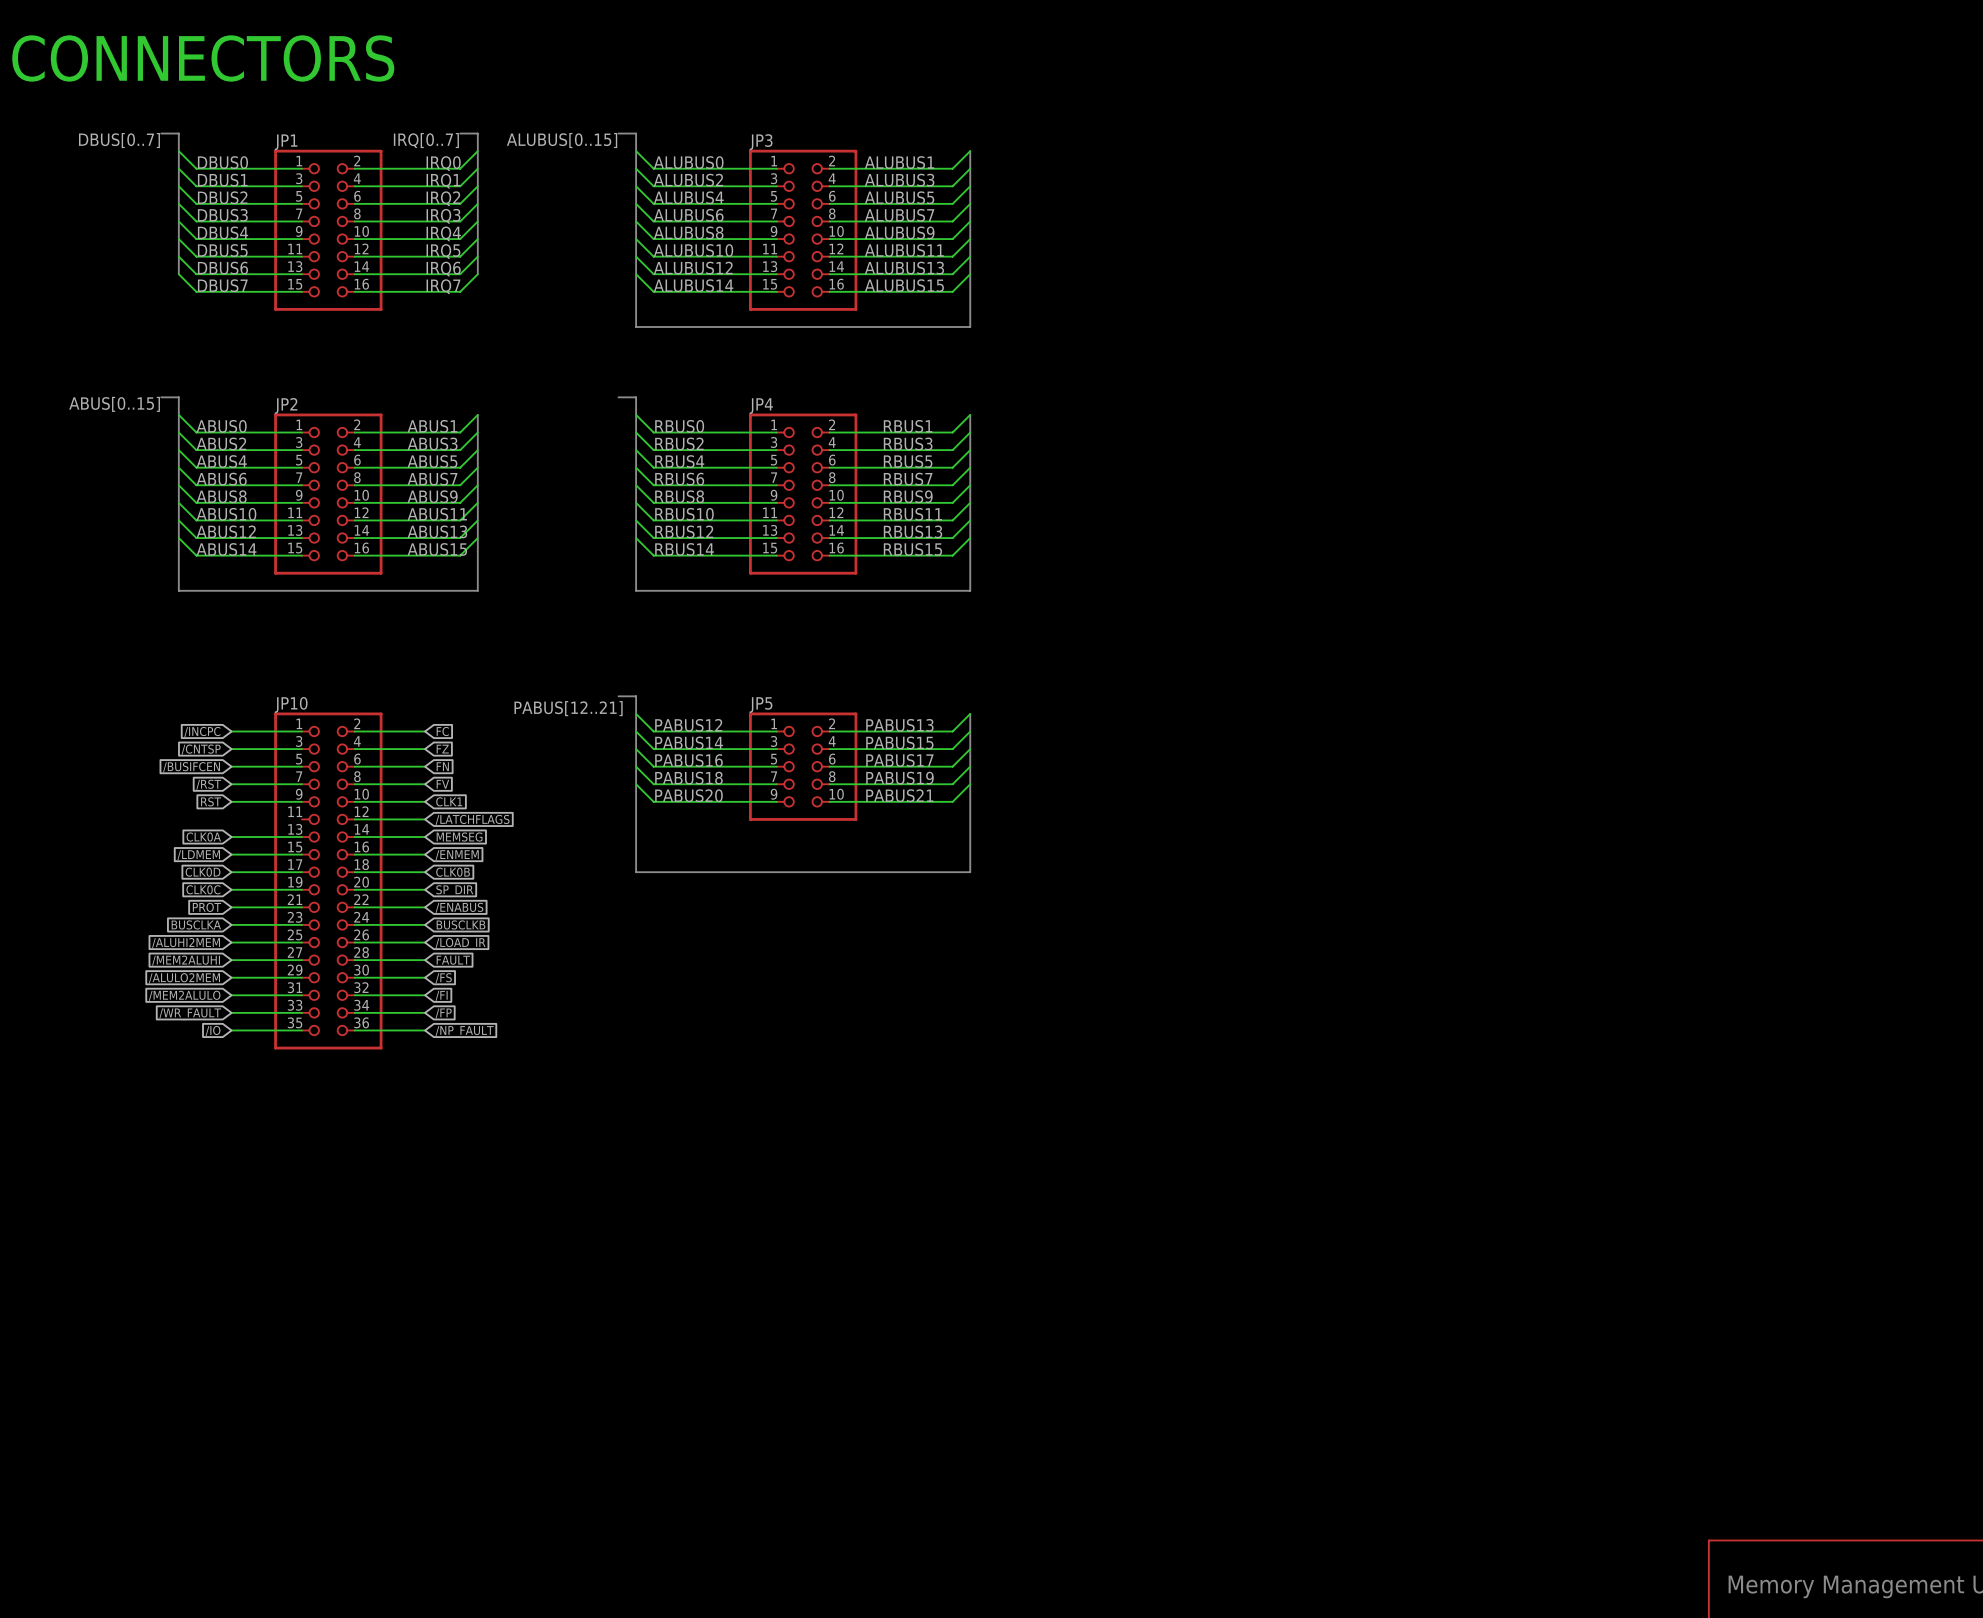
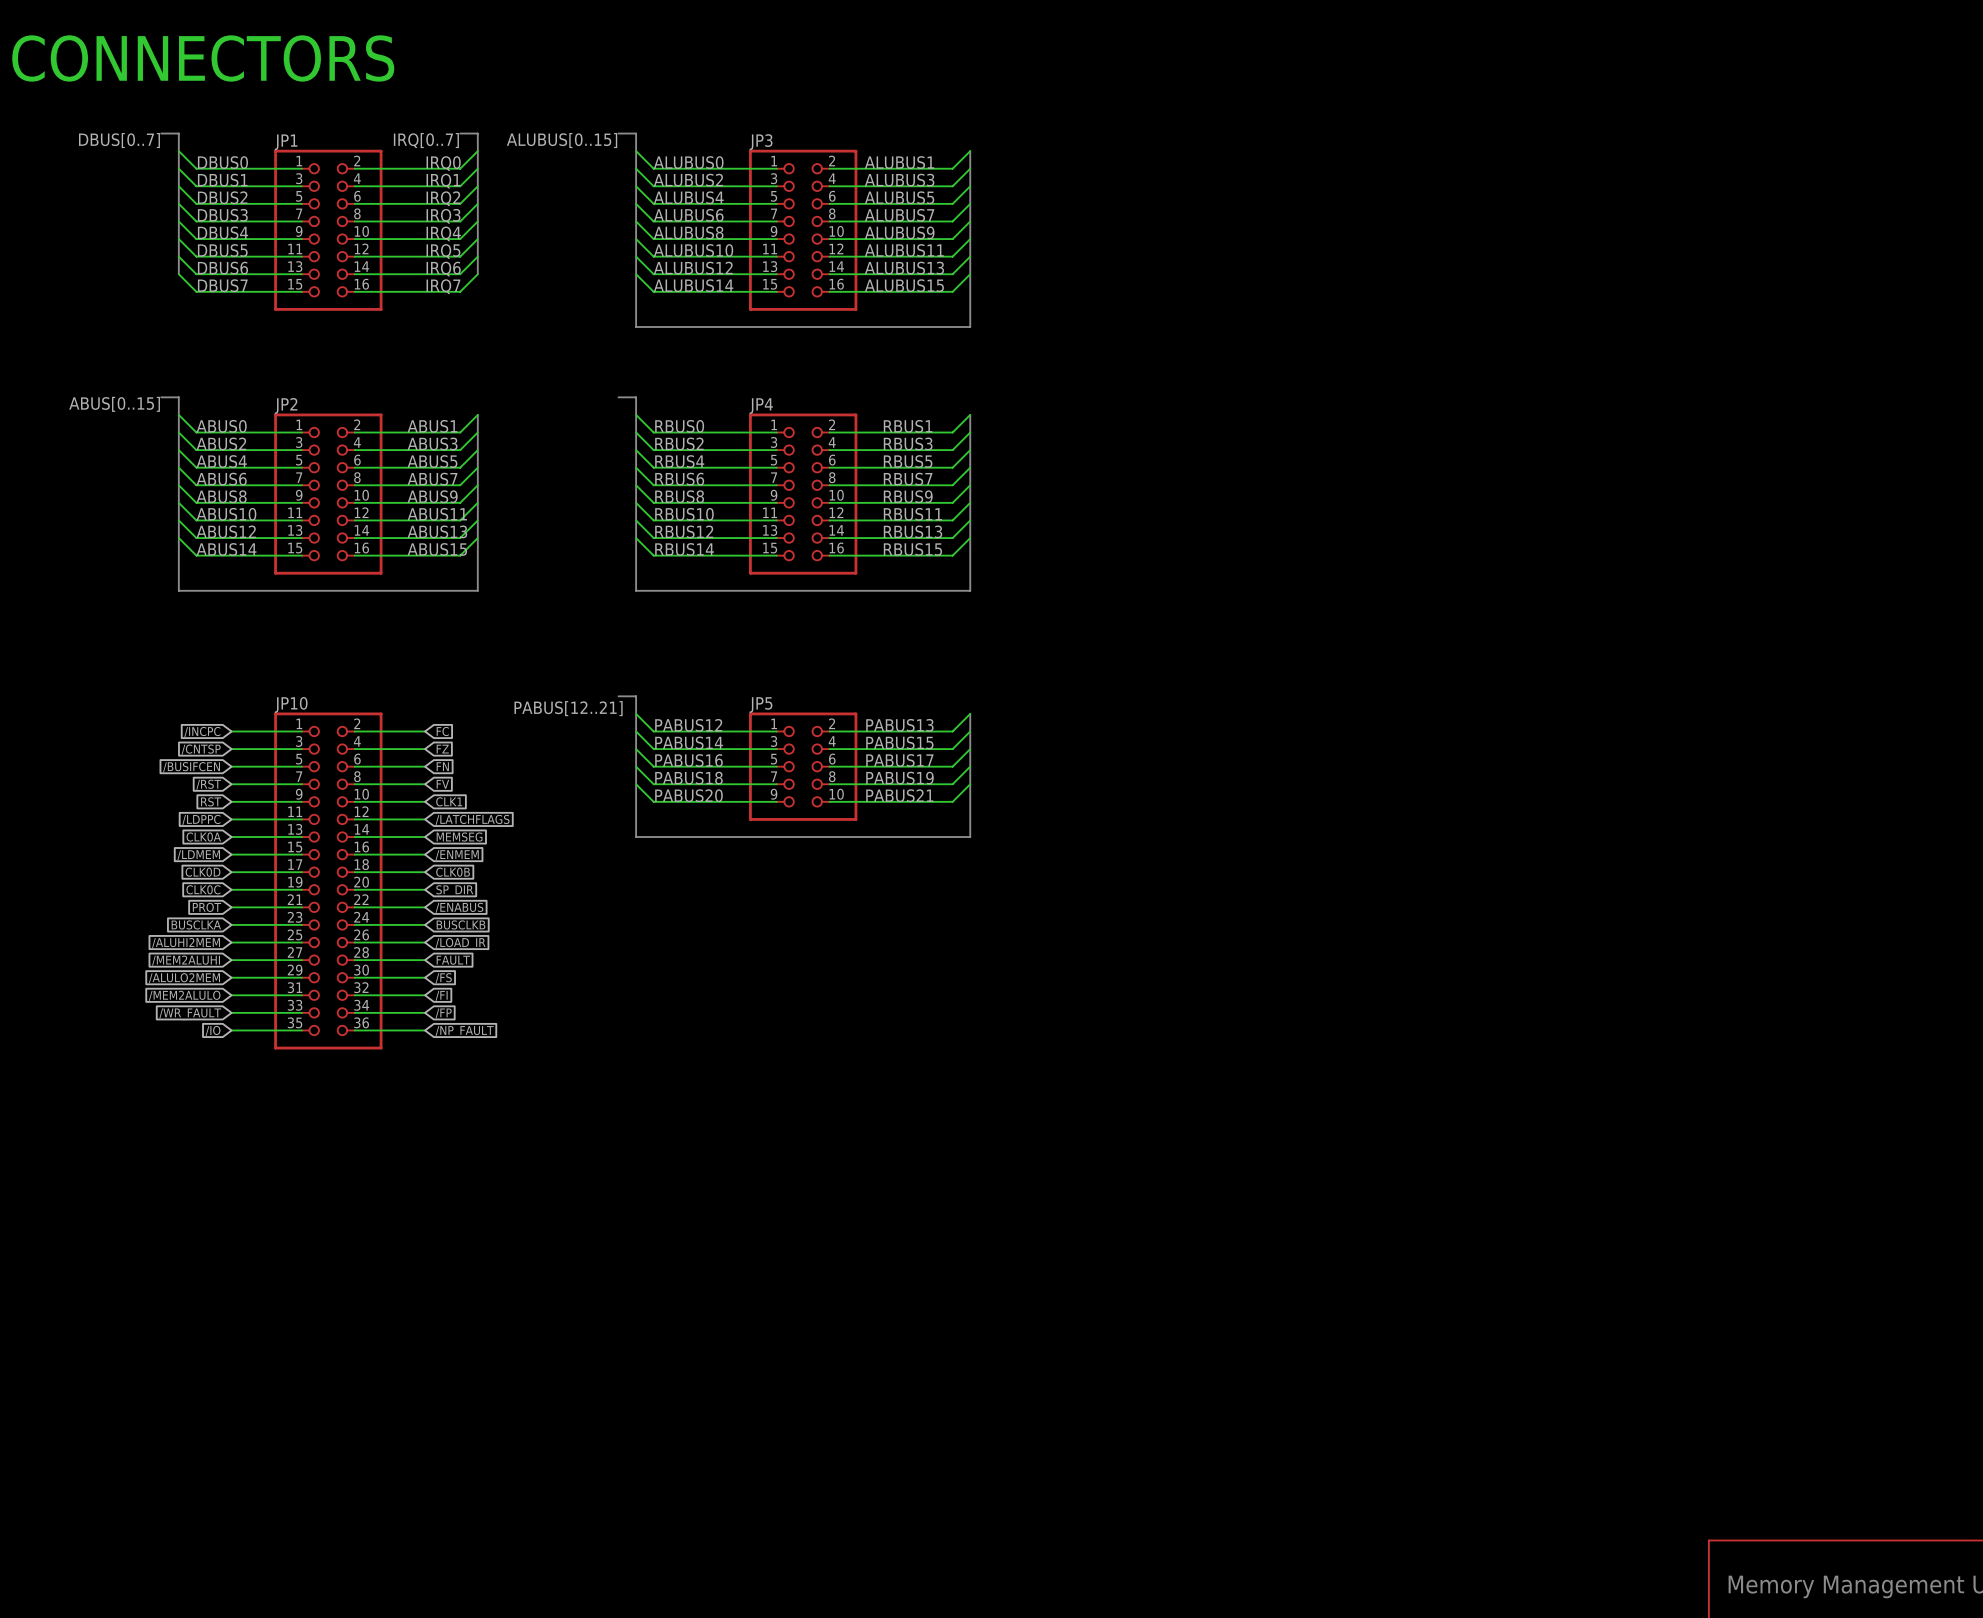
global label: none -> /LDPPC (201, 819)
wire: none -> (231, 819) (301, 819)
bus: (636, 837) (636, 872) (970, 872) (970, 837) -> (636, 837) (970, 837)

